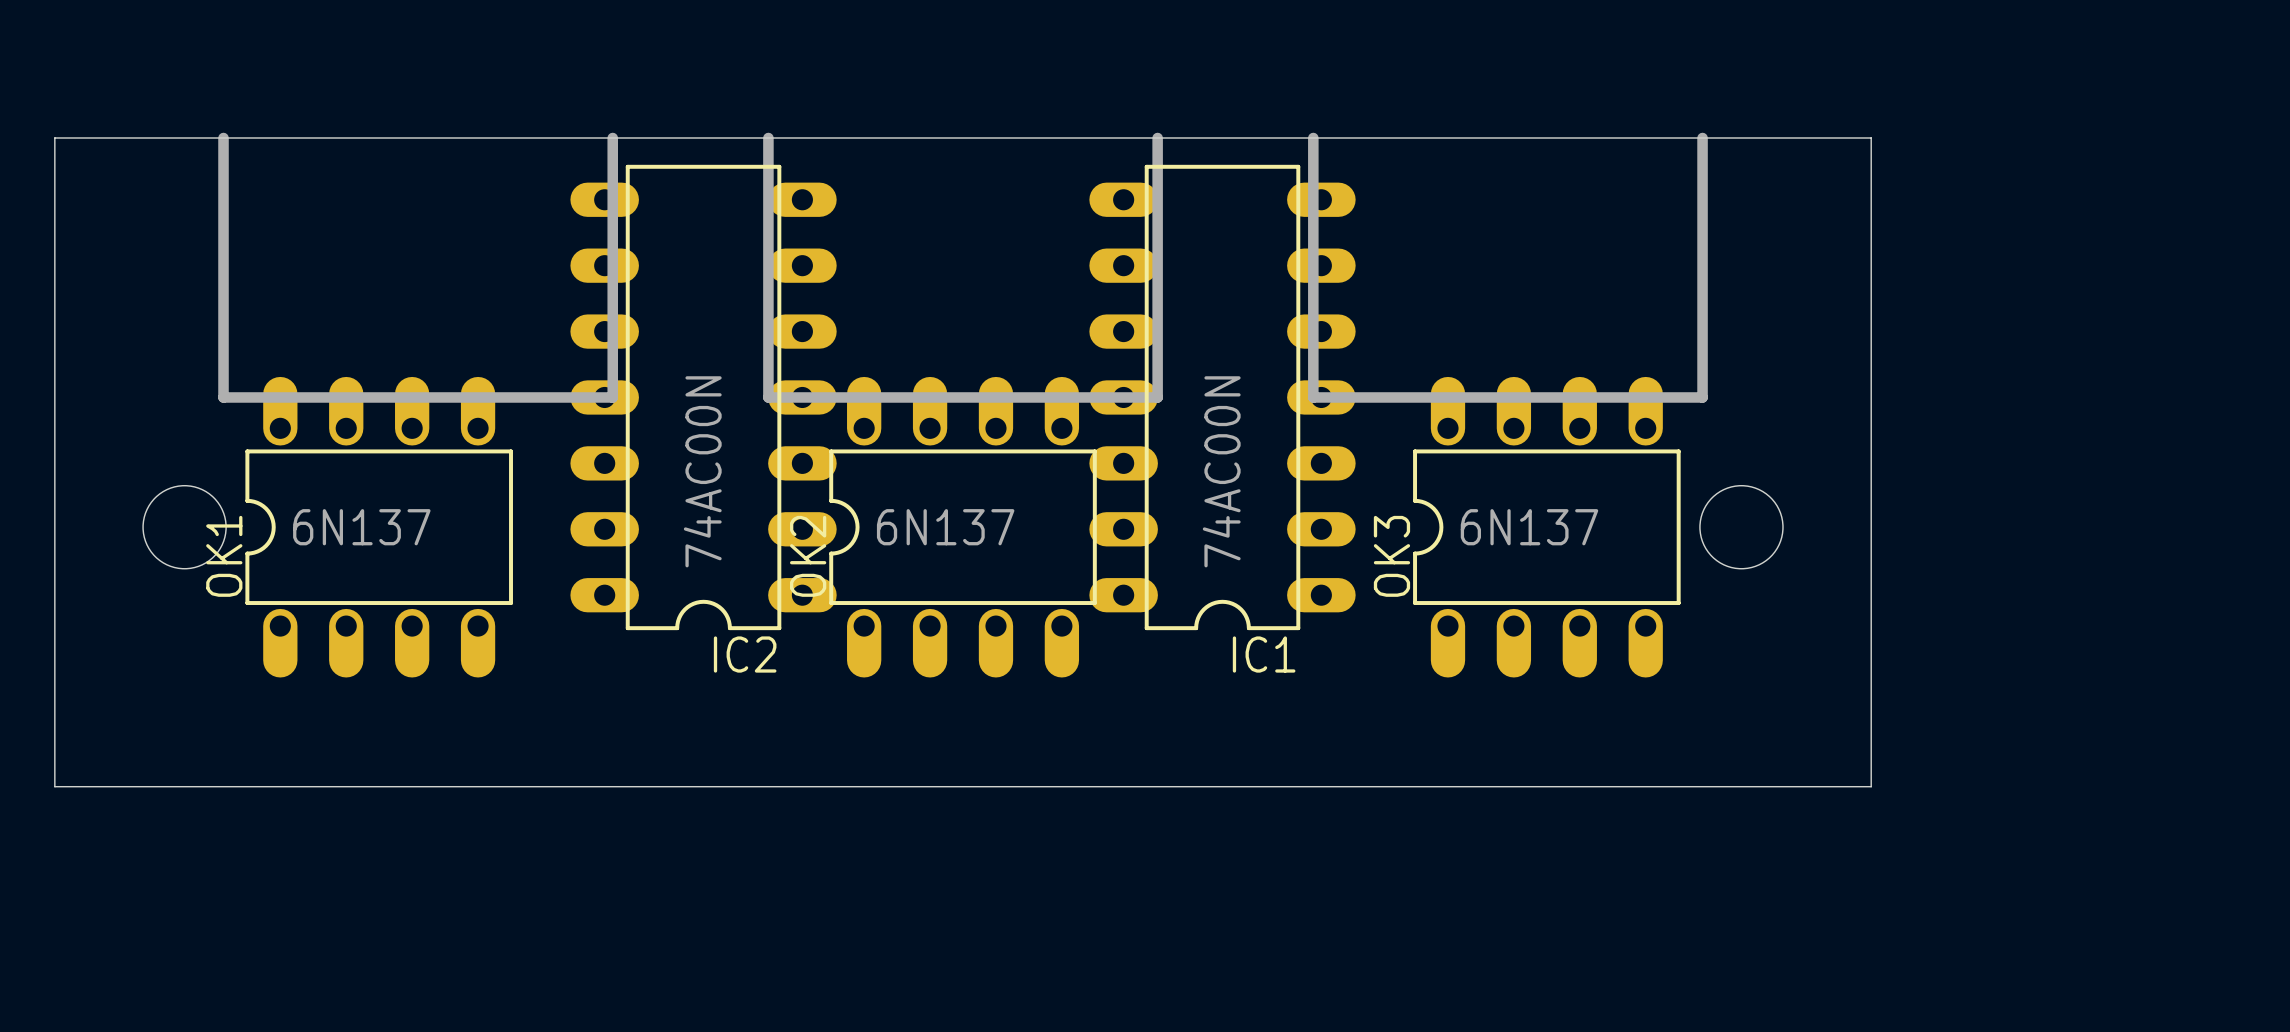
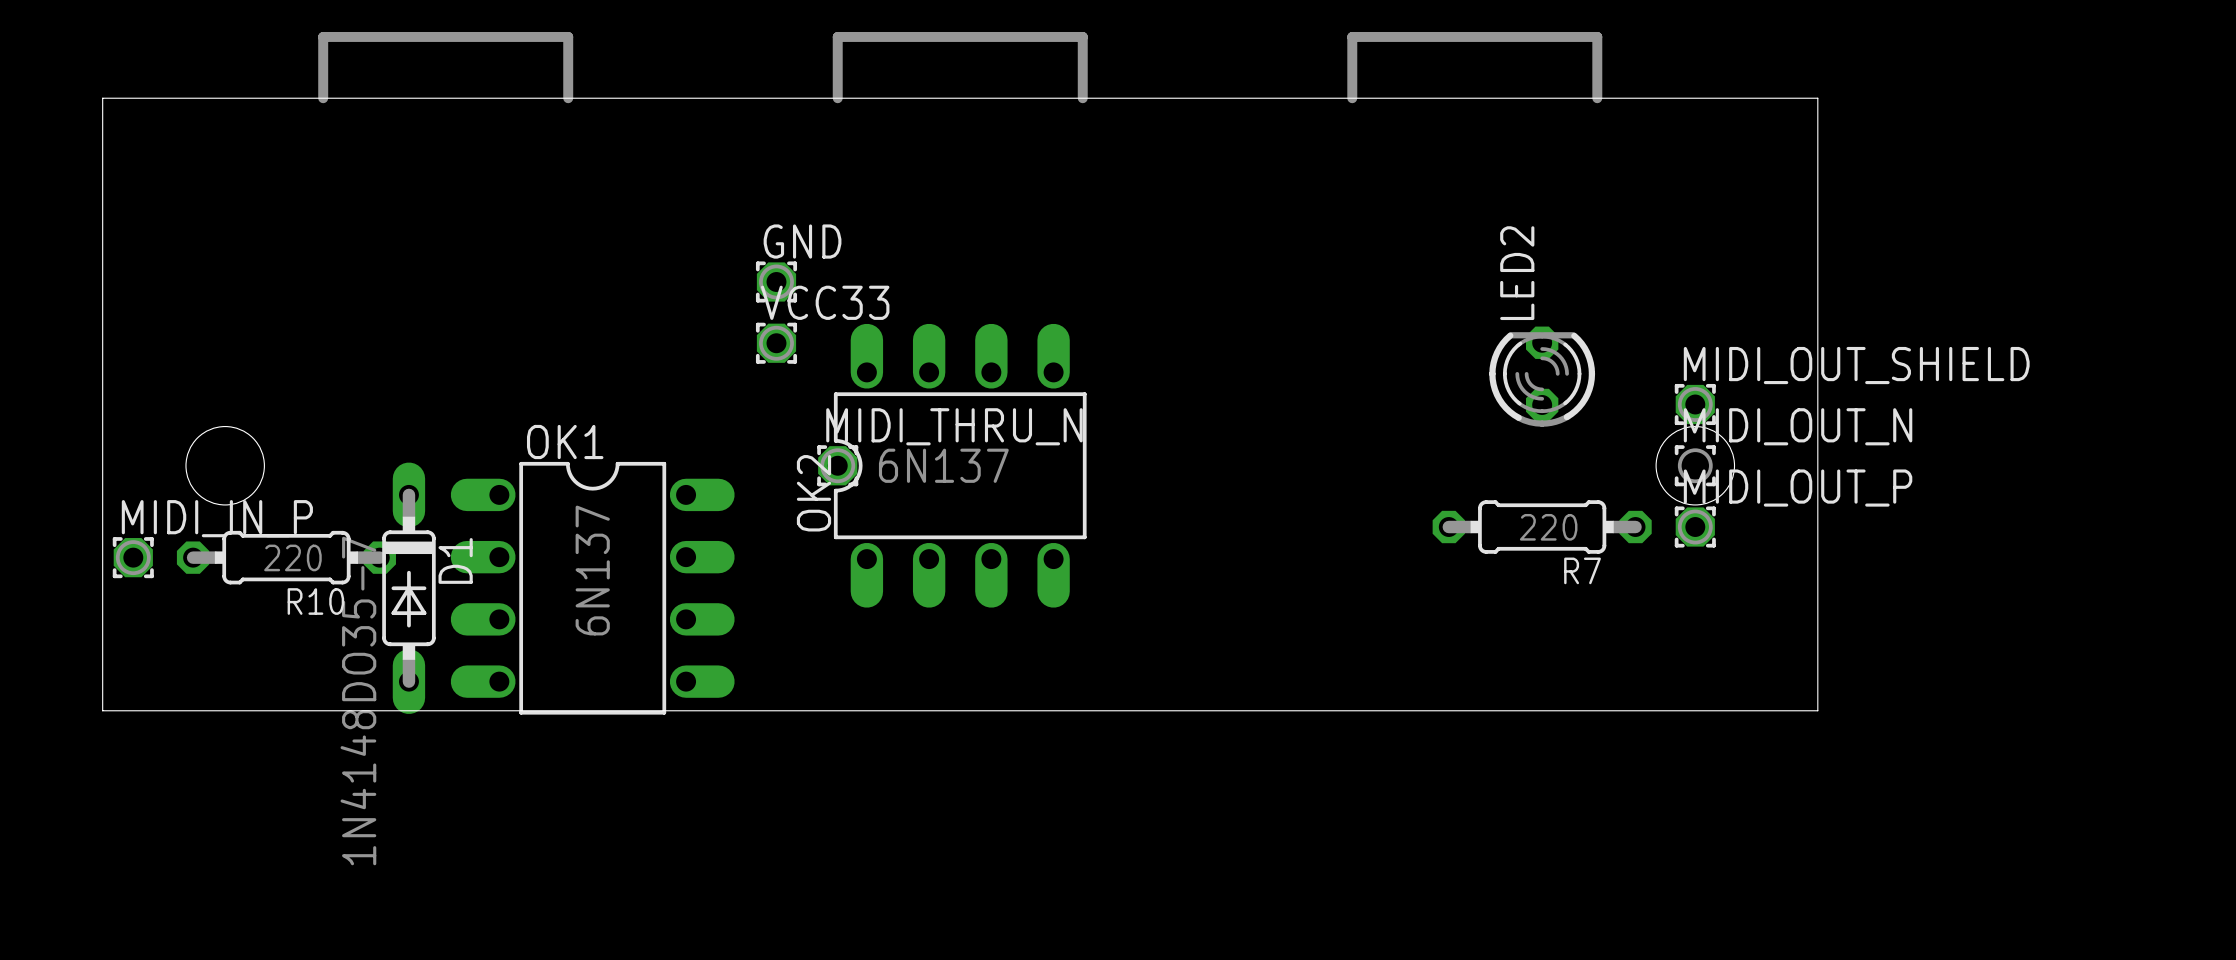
line: (223, 138) (223, 397) (612, 397) (612, 138) -> none
line: none -> (323, 98) (323, 36) (568, 36) (568, 98)
line: (768, 138) (768, 397) (1157, 397) (1157, 138) -> none
line: none -> (837, 98) (837, 36) (1082, 36) (1082, 98)
line: (1313, 138) (1313, 397) (1702, 397) (1702, 138) -> none
line: none -> (1352, 98) (1352, 36) (1597, 36) (1597, 98)
GND: none -> (776, 281)
IC2: 74AC00N (703, 397) -> none
VCC33: none -> (776, 343)
IC1: 74AC00N (1222, 397) -> none
LED2: none -> (1542, 376)
MIDI_OUT_SHIELD: none -> (1695, 404)
OK1 rotation: 0° (379, 527) -> 90° clockwise (592, 588)
OK1 position: (379, 527) -> (592, 588)
MIDI_THRU_N: none -> (837, 465)
OK3: 6N137 (1546, 527) -> none
MIDI_OUT_N: none -> (1695, 465)
R7: none -> 220 (1542, 527)
MIDI_OUT_P: none -> (1695, 527)
MIDI_IN_P: none -> (133, 557)
R10: none -> 220 (286, 557)
D1: none -> 1N4148DO35-7 (408, 588)

